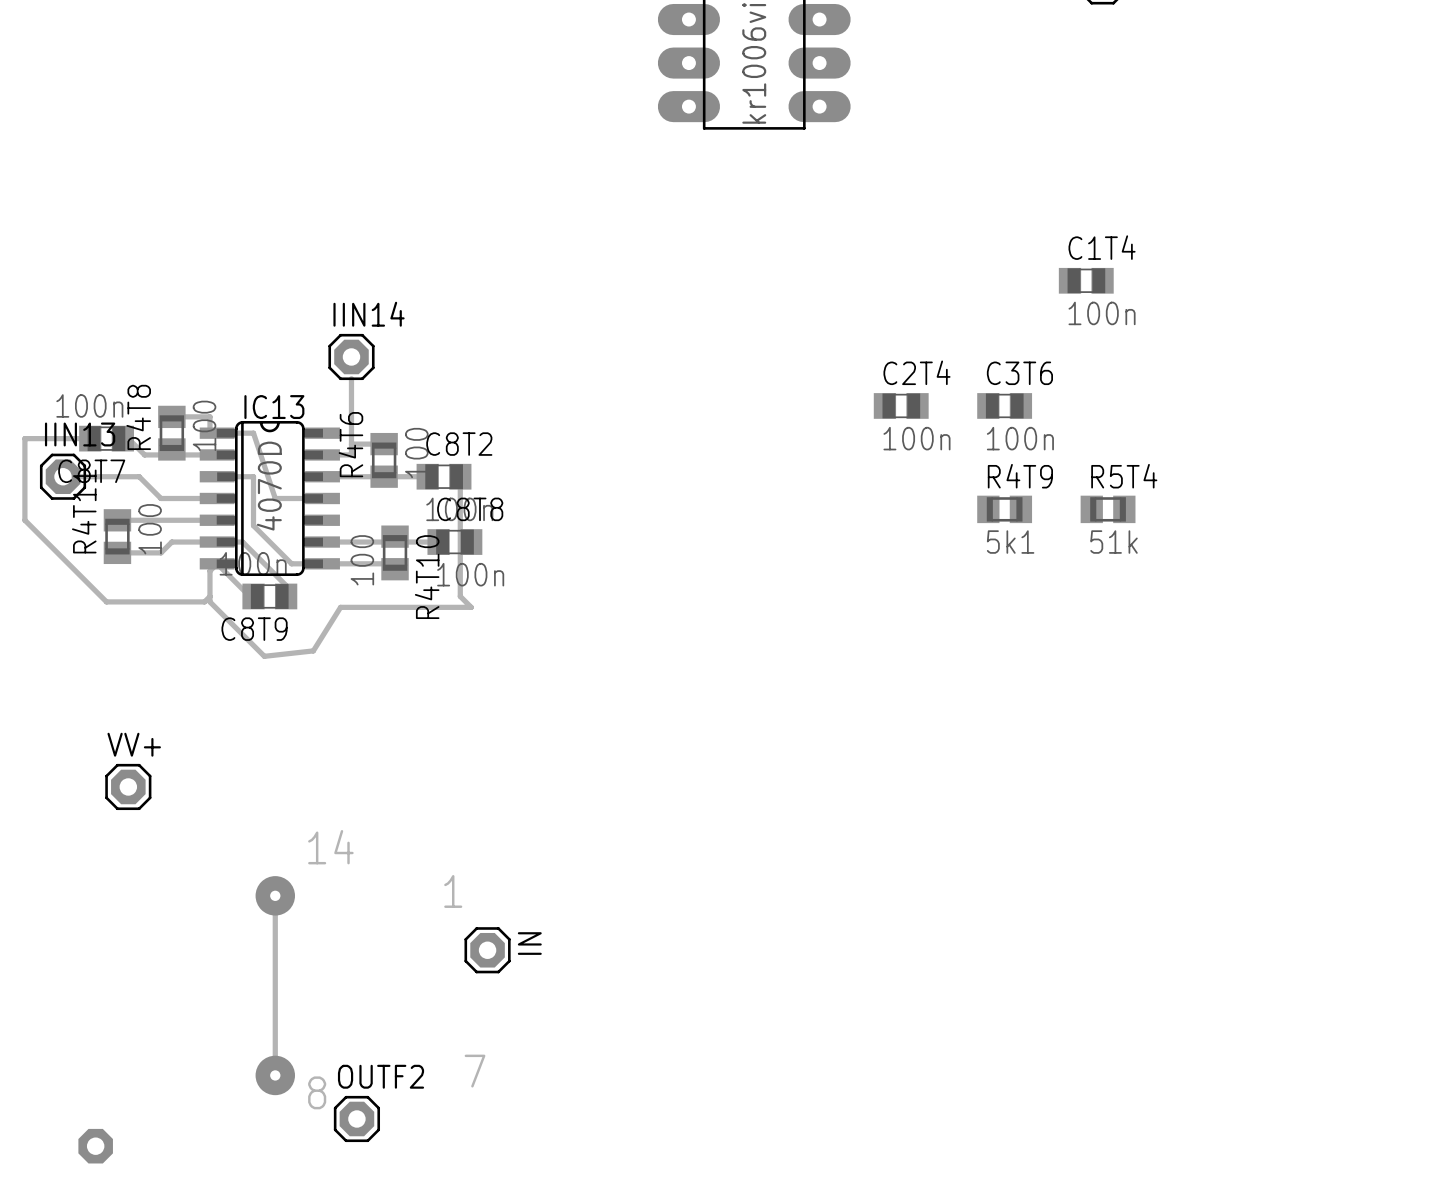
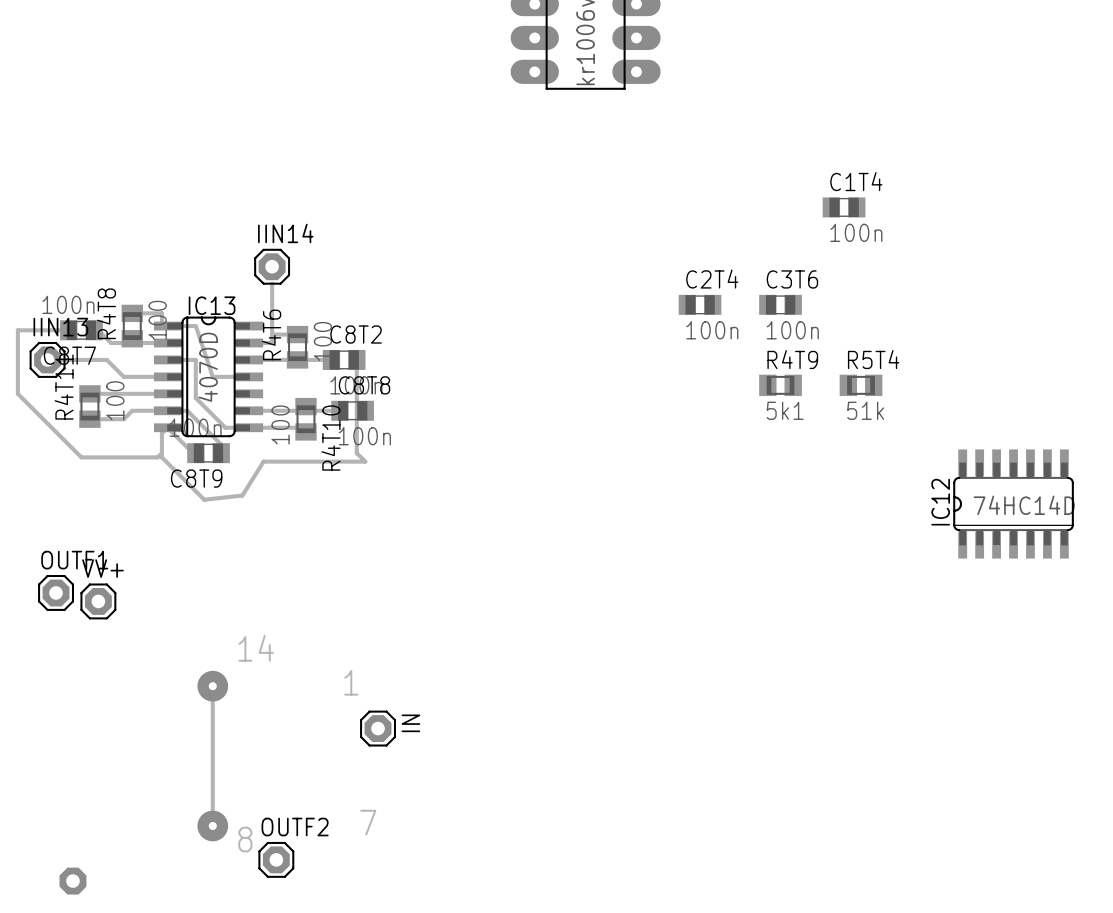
IC12: none -> 74HC14D (1013, 504)
OUTF1: none -> (56, 592)

